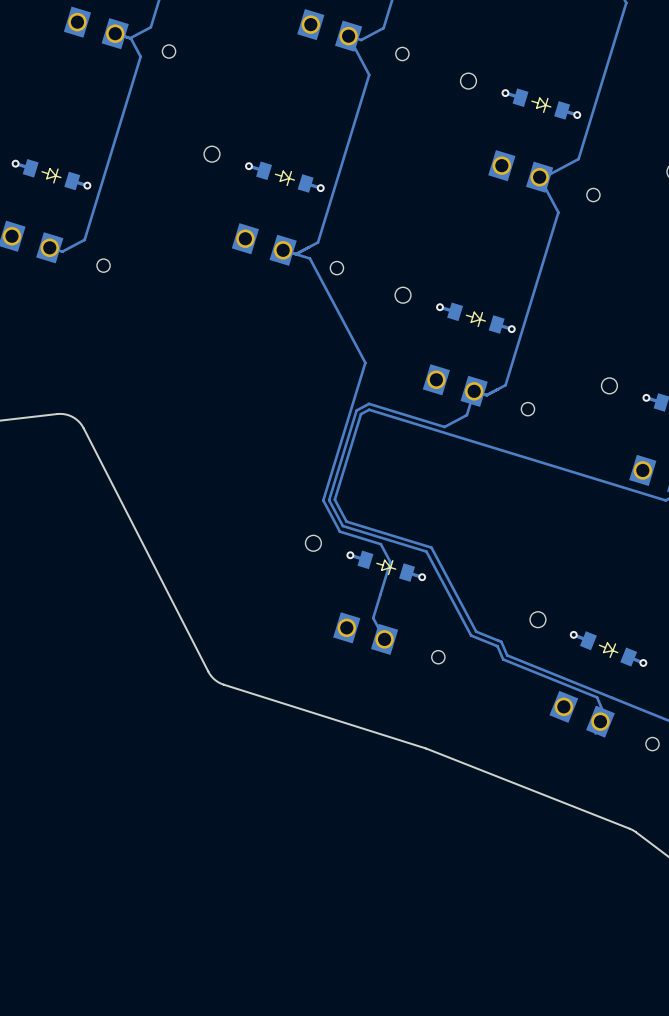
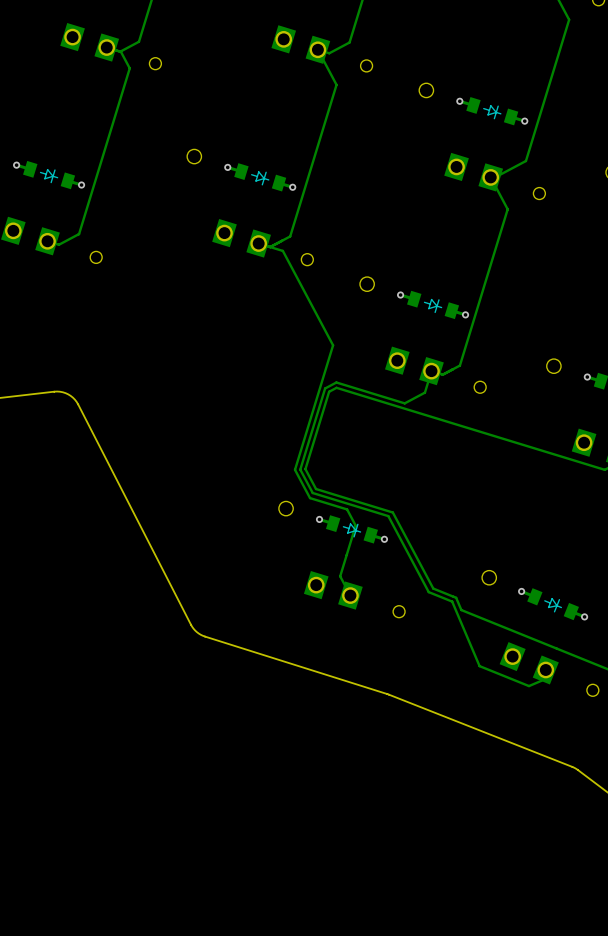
track: (497, 646) (503, 659) (597, 697) (603, 713) (600, 721) -> (452, 601) (479, 666) (529, 686) (541, 680)

